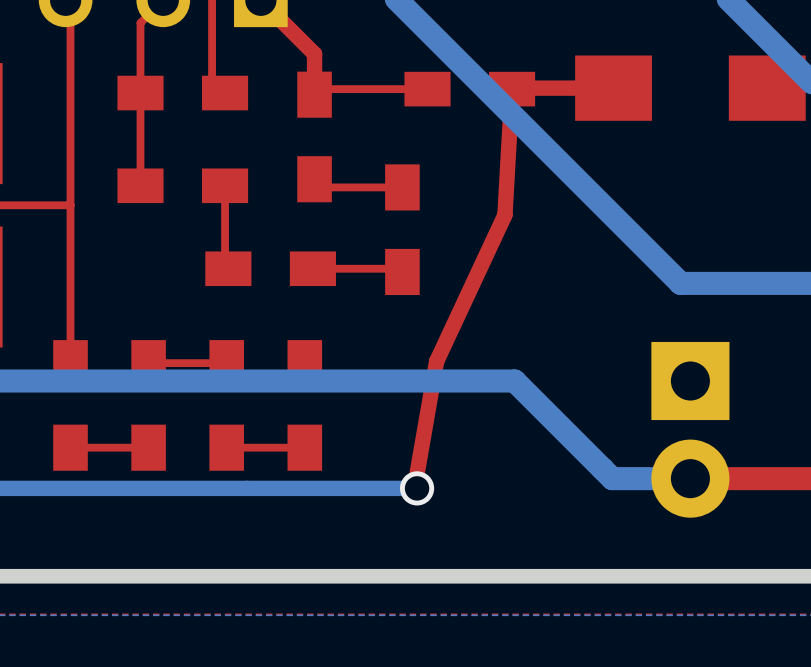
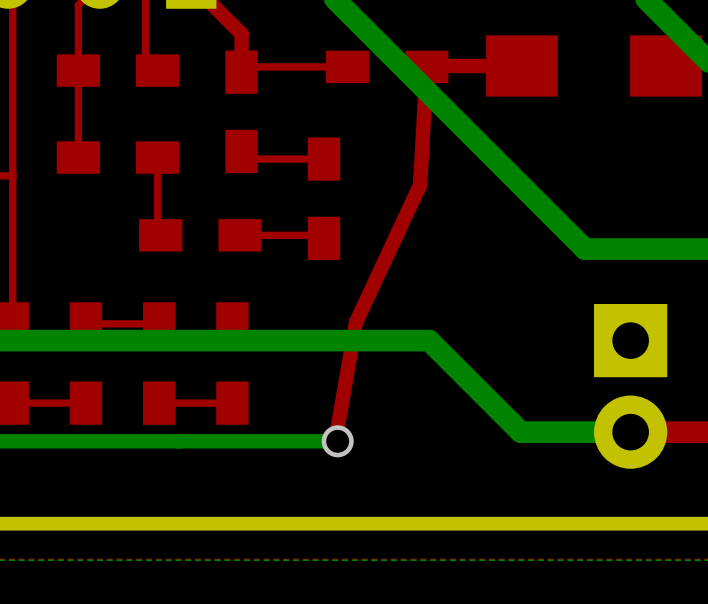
part position: (690, 429) -> (630, 386)

